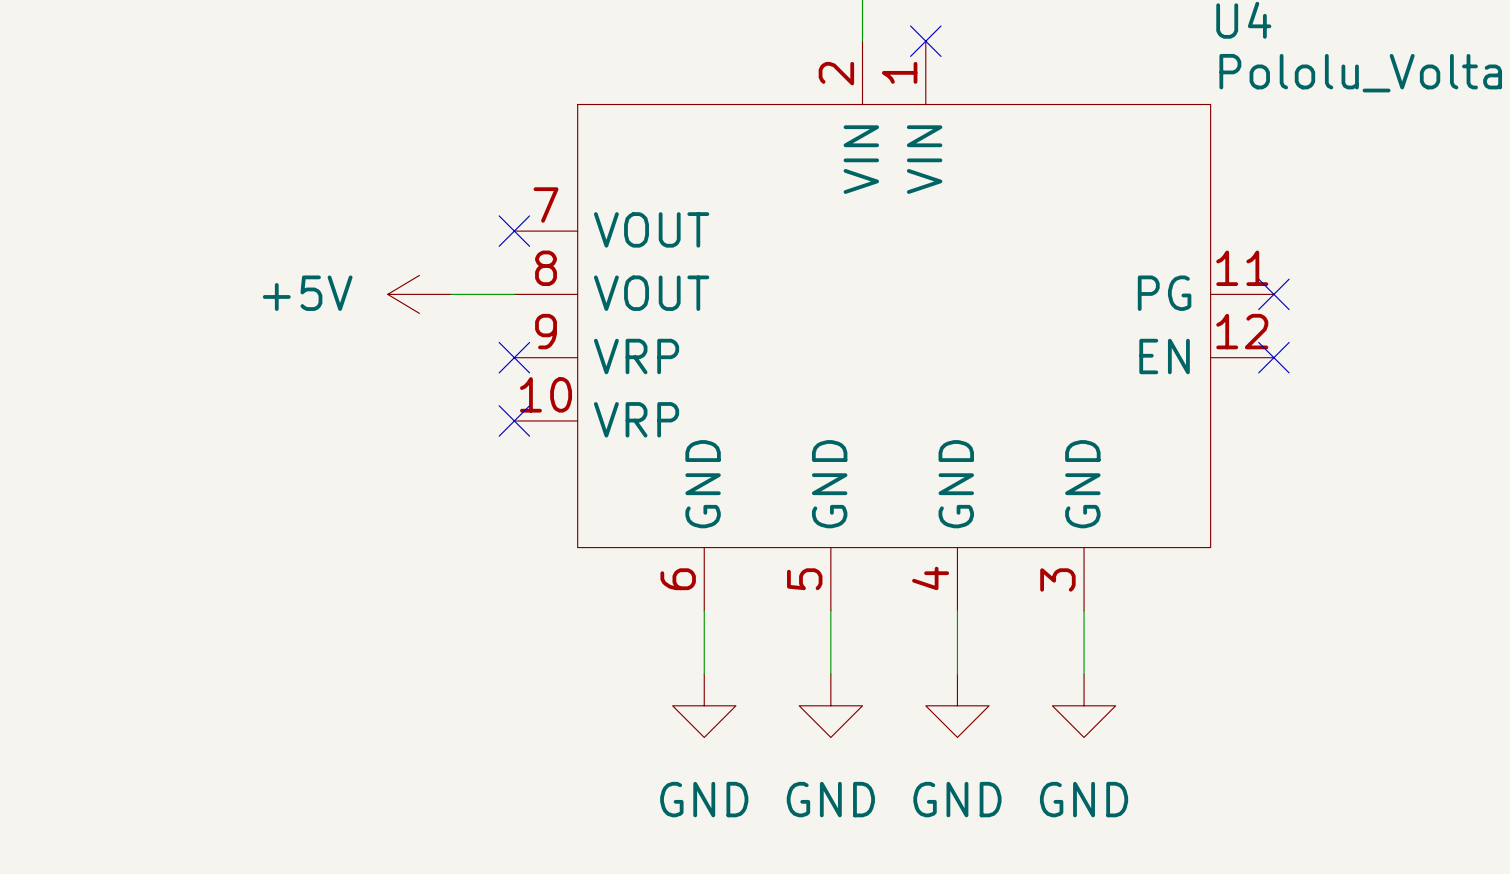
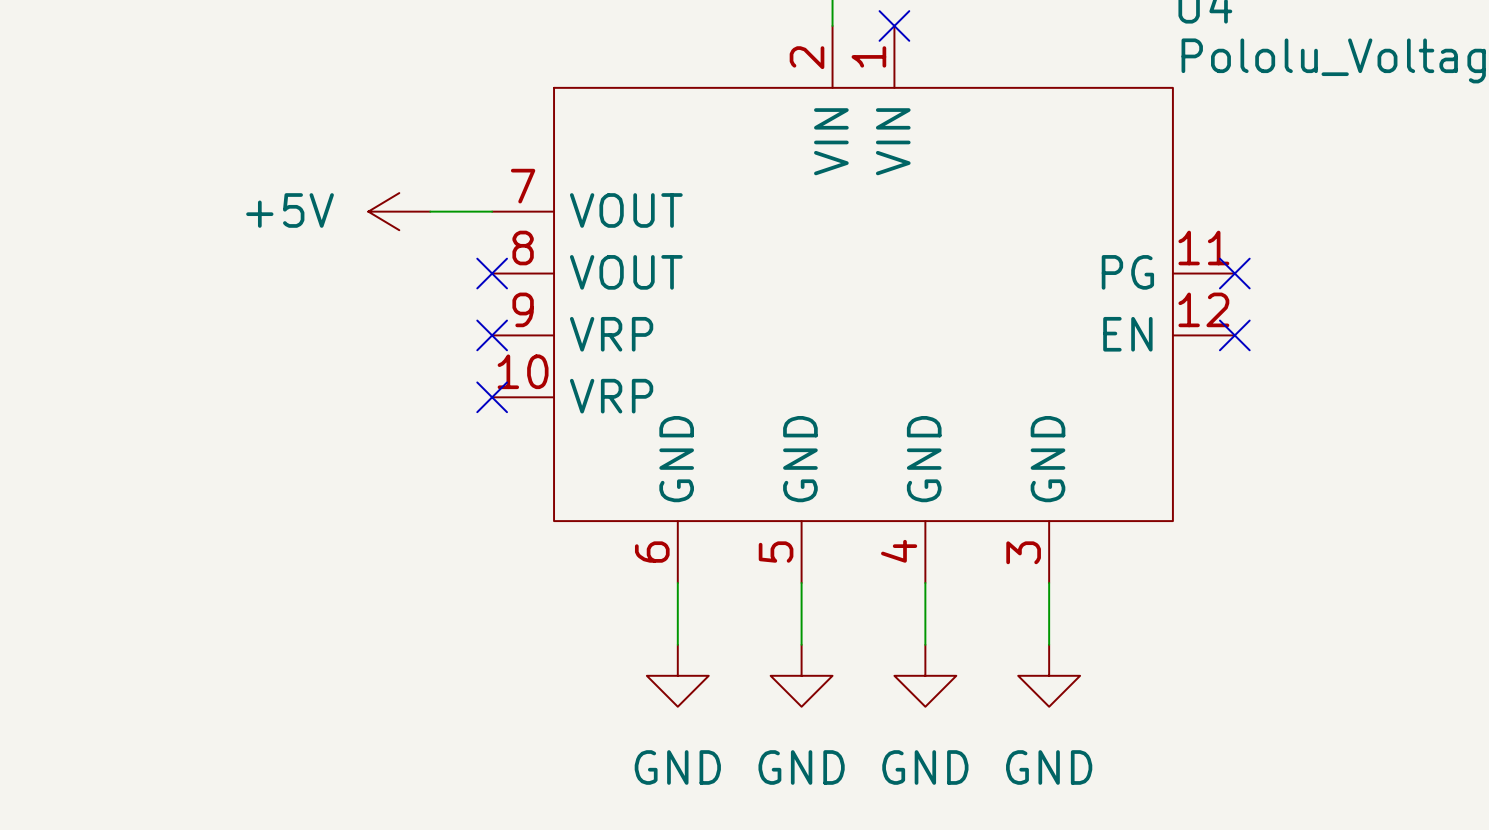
no-connect mark position: (514, 231) -> (492, 273)
power symbol position: +5V (419, 294) -> +5V (399, 211)
wire: (451, 294) (514, 294) -> (430, 211) (492, 211)

